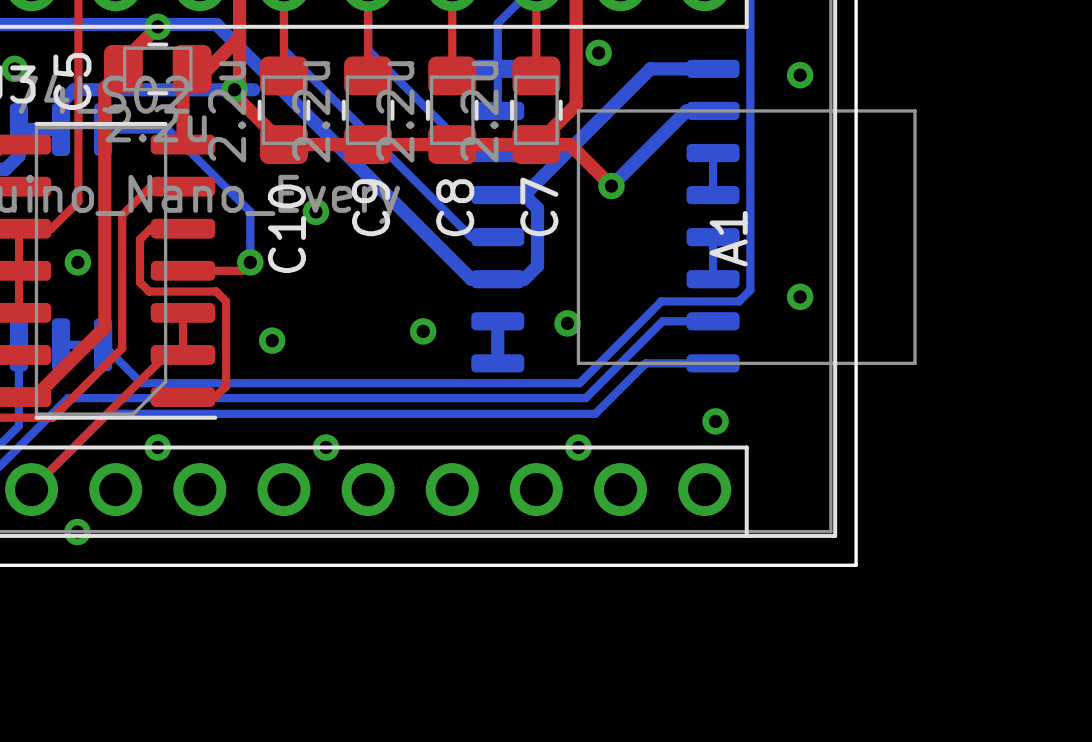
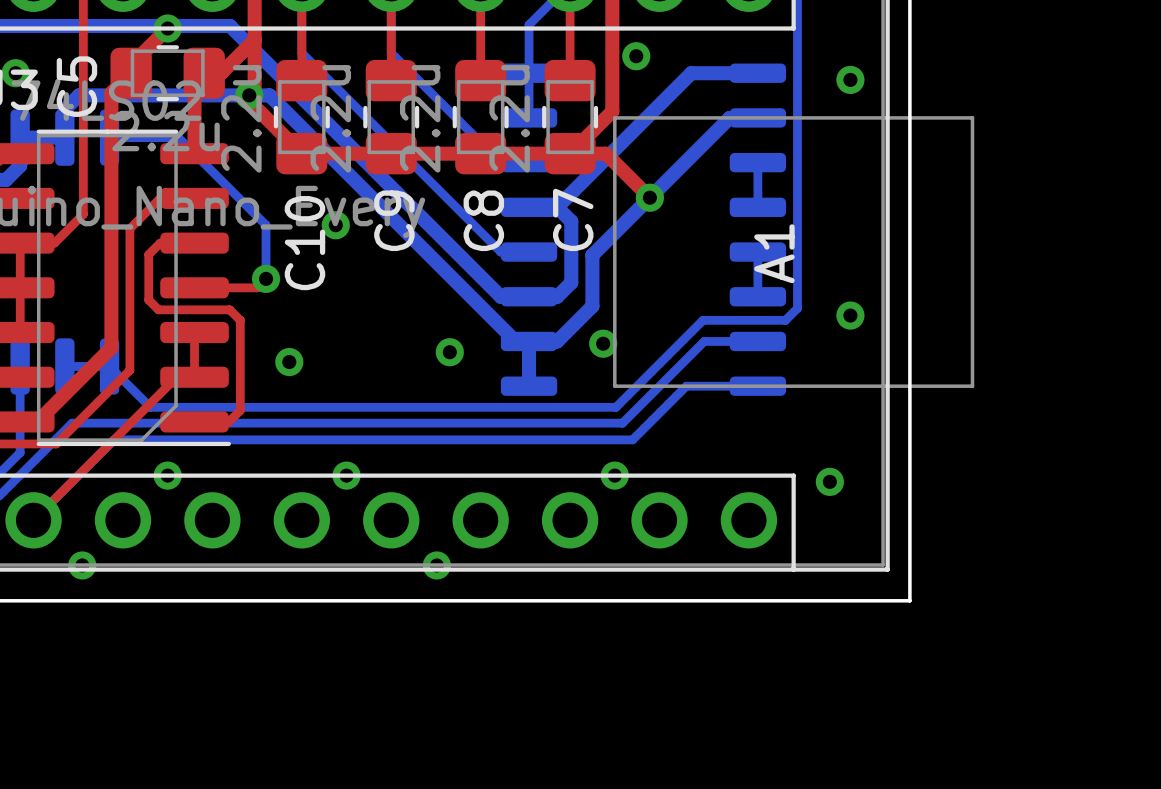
bottom track: none -> (269, 95) (515, 341)
bottom track: none -> (649, 197) (592, 255) (592, 306) (557, 341) (529, 341)
via: (77, 262) -> none
via position: (715, 421) -> (829, 481)
via: none -> (436, 565)

